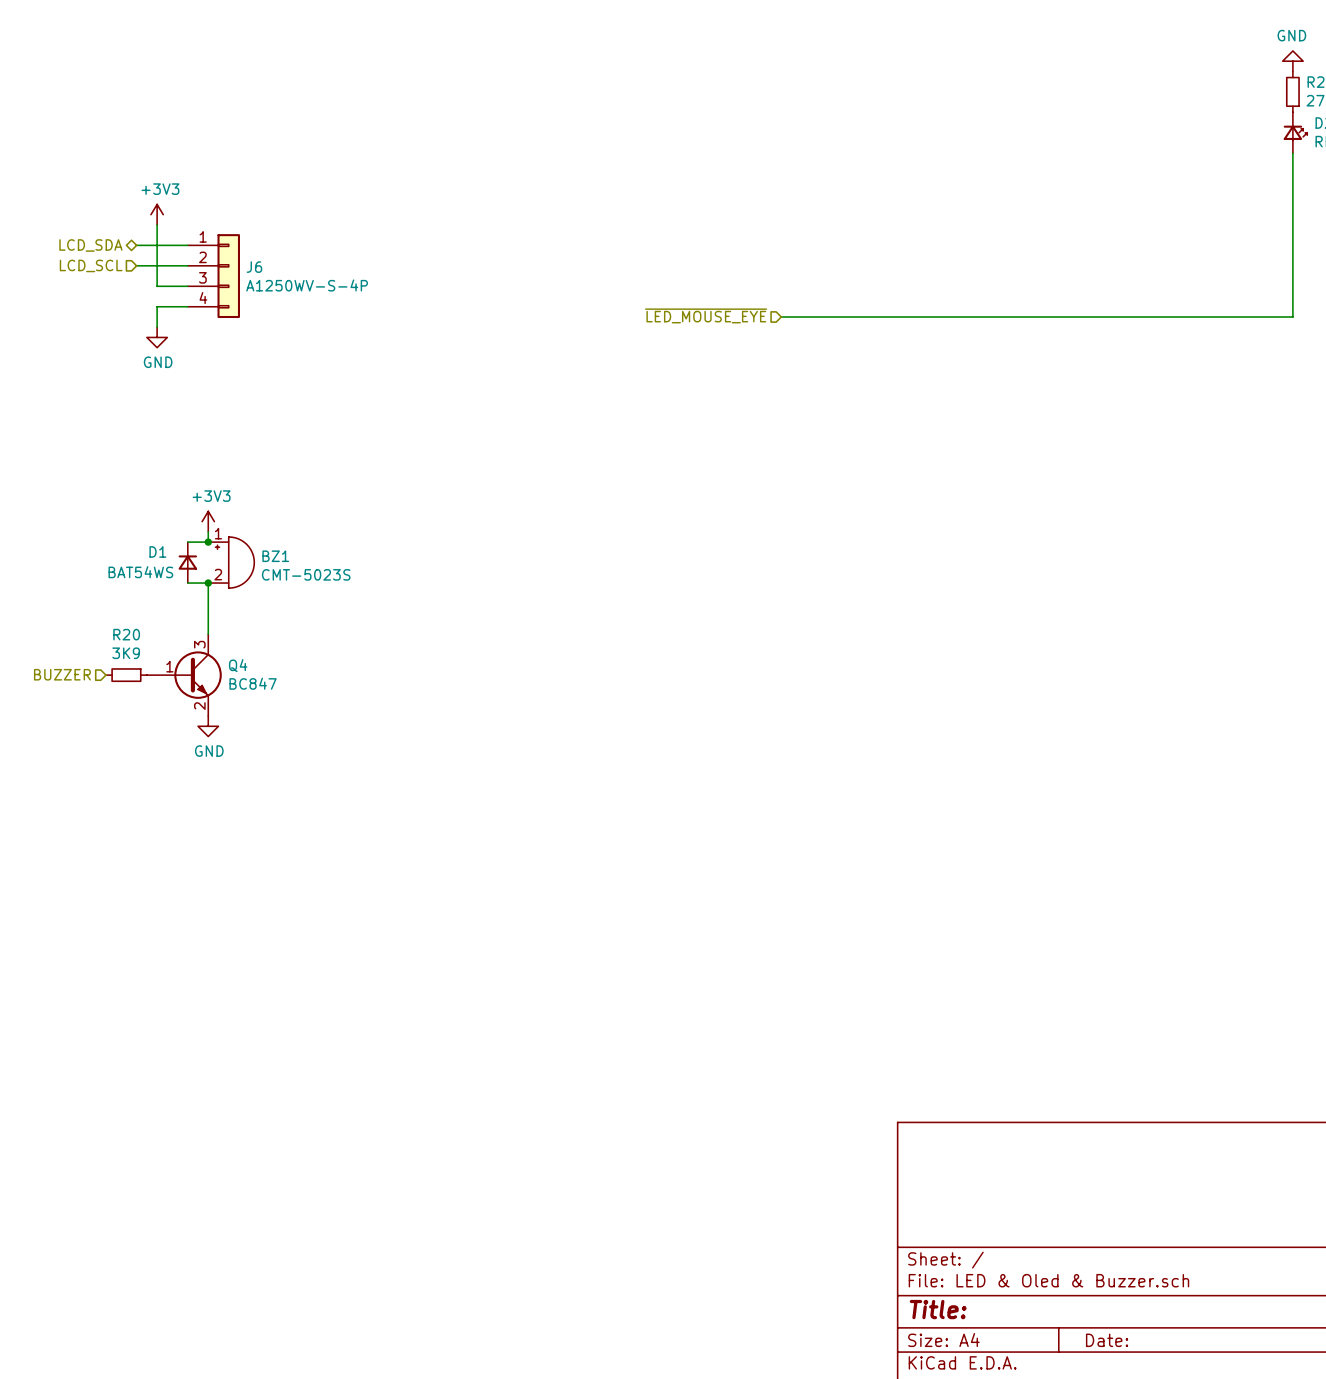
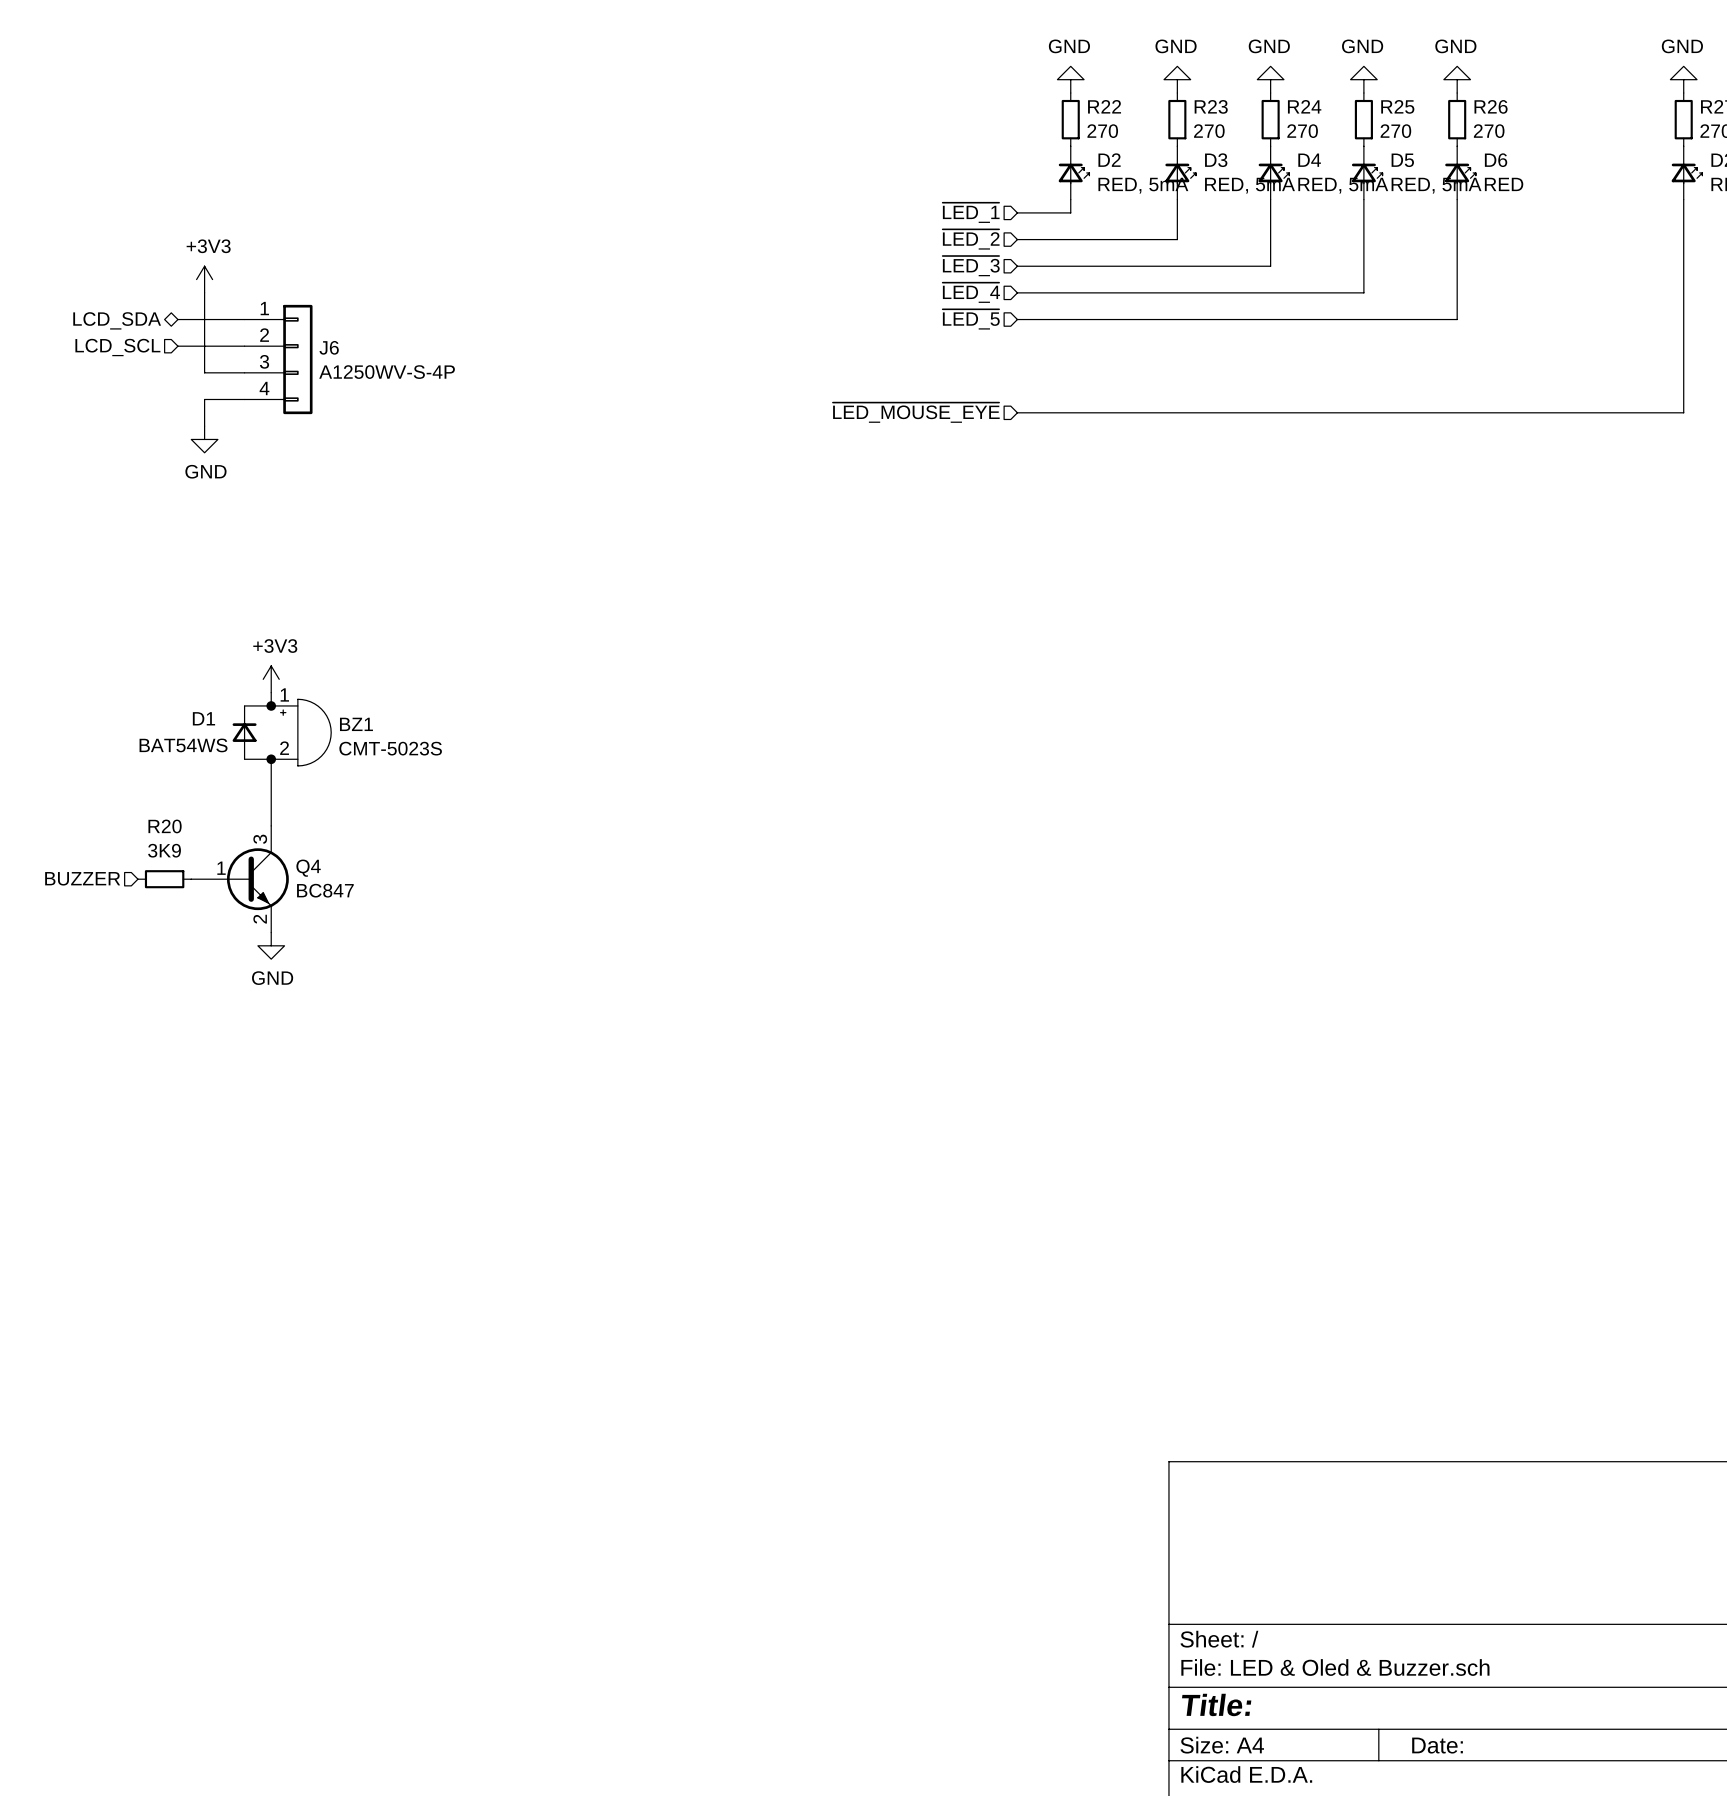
power symbol: none -> GND (1070, 79)
power symbol: none -> GND (1177, 79)
power symbol: none -> GND (1270, 79)
power symbol: none -> GND (1363, 79)
power symbol: none -> GND (1457, 79)
R22: none -> 270 (1070, 119)
R23: none -> 270 (1177, 119)
R24: none -> 270 (1270, 119)
R25: none -> 270 (1363, 119)
R26: none -> 270 (1457, 119)
D2: none -> RED, 5mA (1074, 172)
D3: none -> RED, 5mA (1180, 172)
D4: none -> RED, 5mA (1273, 172)
D5: none -> RED, 5mA (1367, 172)
D6: none -> RED (1460, 172)
wire: none -> (1070, 199) (1070, 212) (1017, 212)
wire: none -> (1177, 199) (1177, 239) (1017, 239)
wire: none -> (1270, 199) (1270, 266) (1017, 266)
wire: none -> (1363, 199) (1363, 292) (1017, 292)
wire: none -> (1457, 199) (1457, 319) (1017, 319)
hierarchical label: none -> ~{LED_1} (971, 212)
hierarchical label: none -> ~{LED_2} (971, 239)
hierarchical label: none -> ~{LED_3} (971, 266)
hierarchical label: none -> ~{LED_4} (971, 292)
hierarchical label: none -> ~{LED_5} (971, 319)

